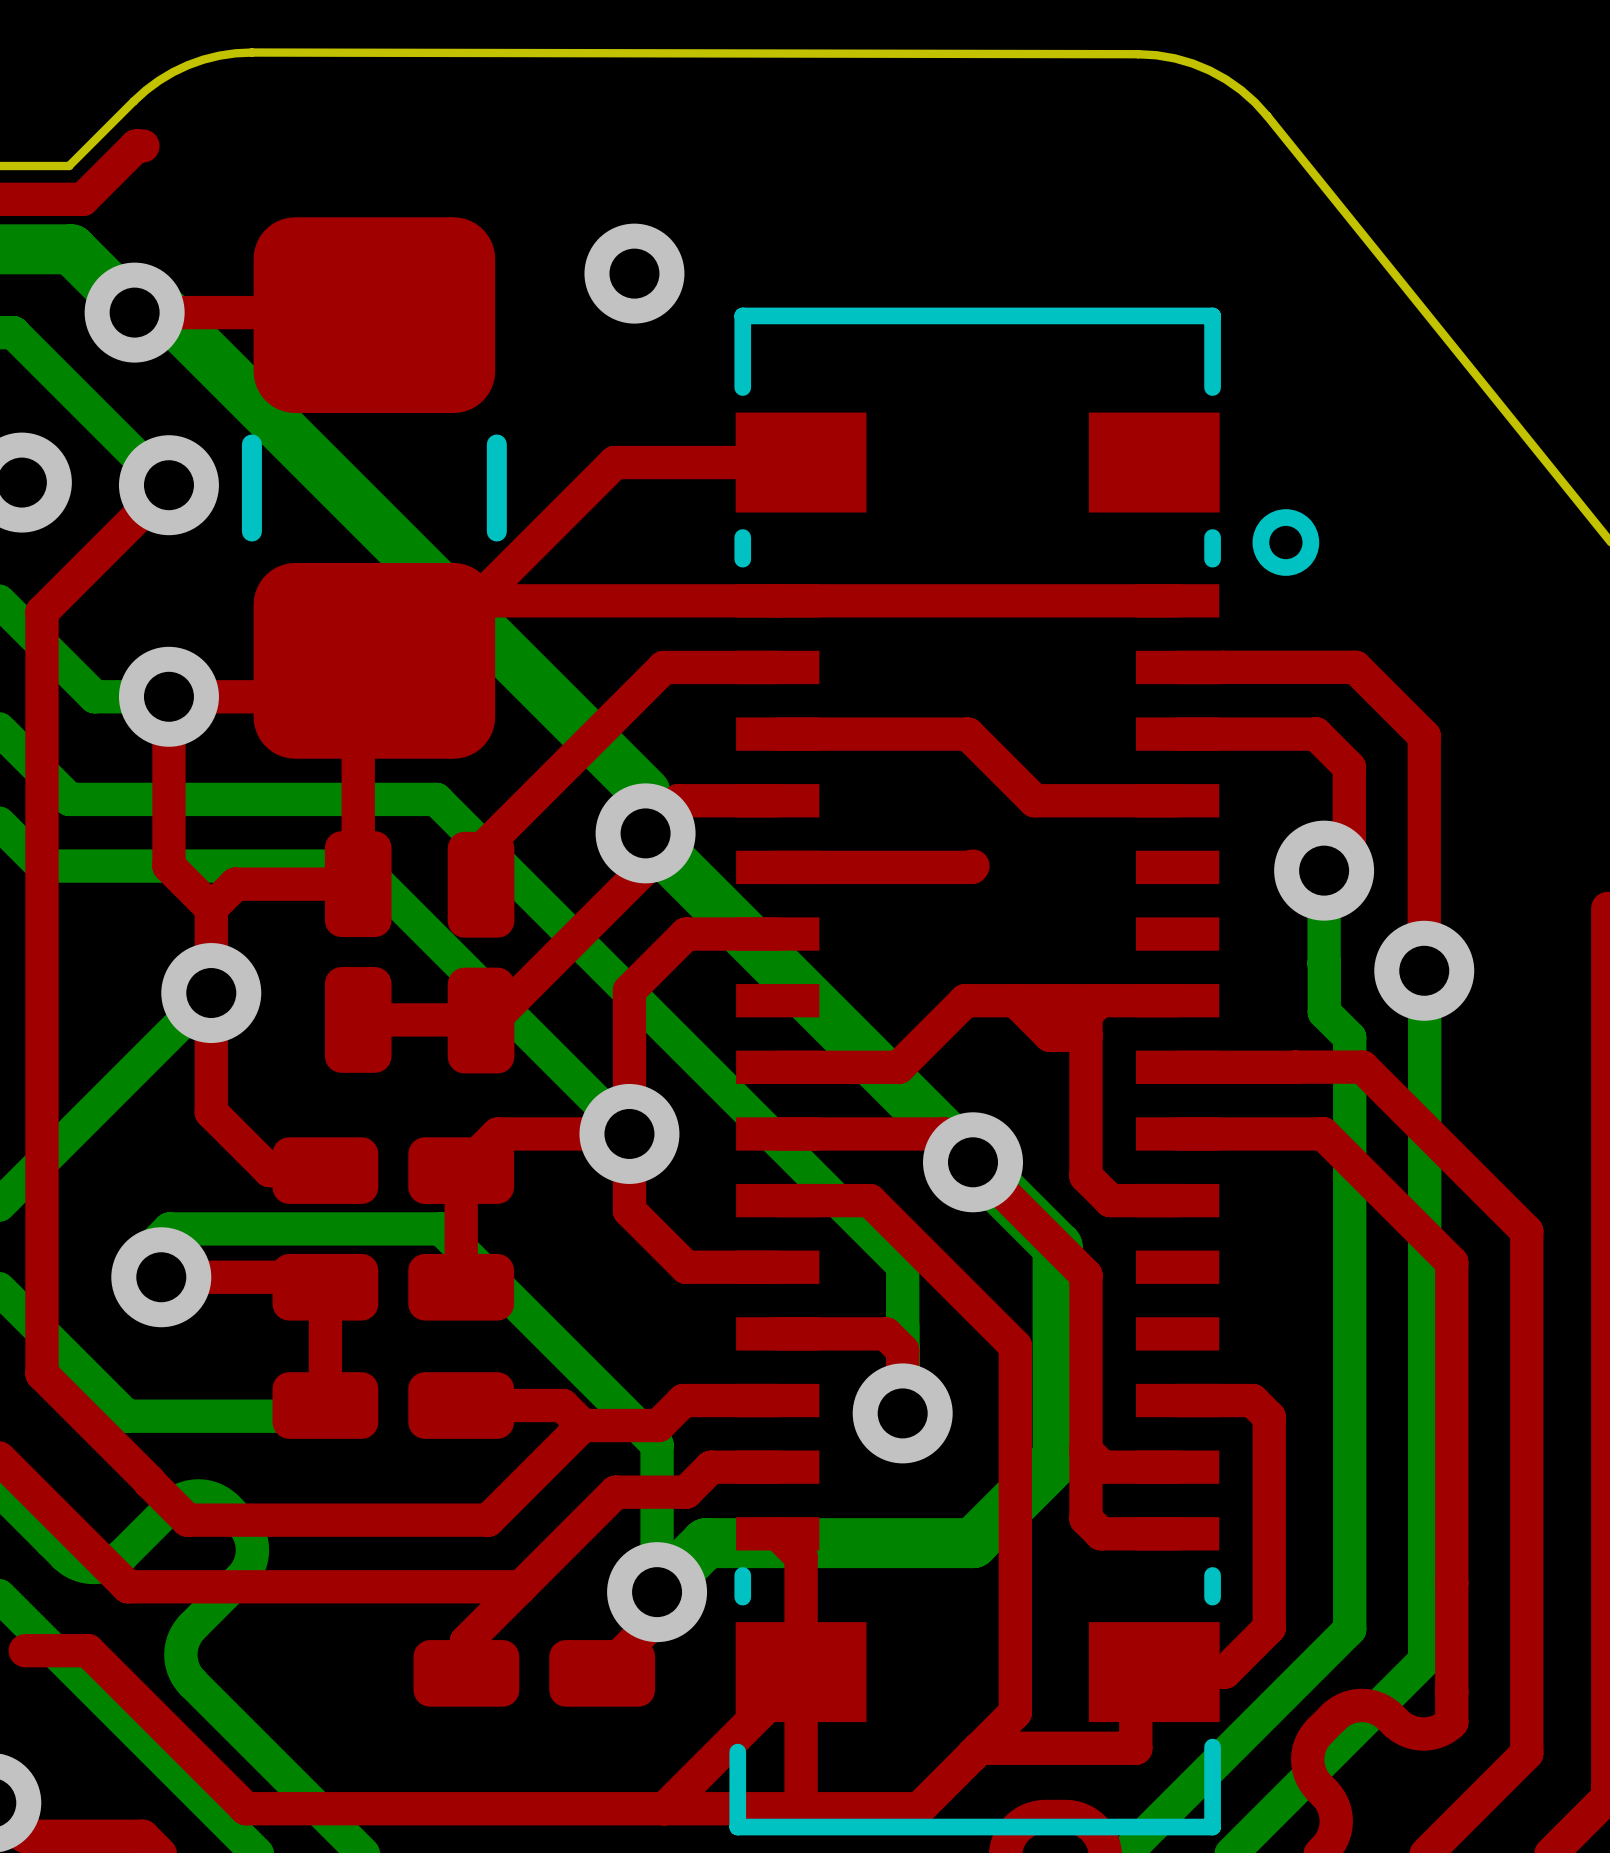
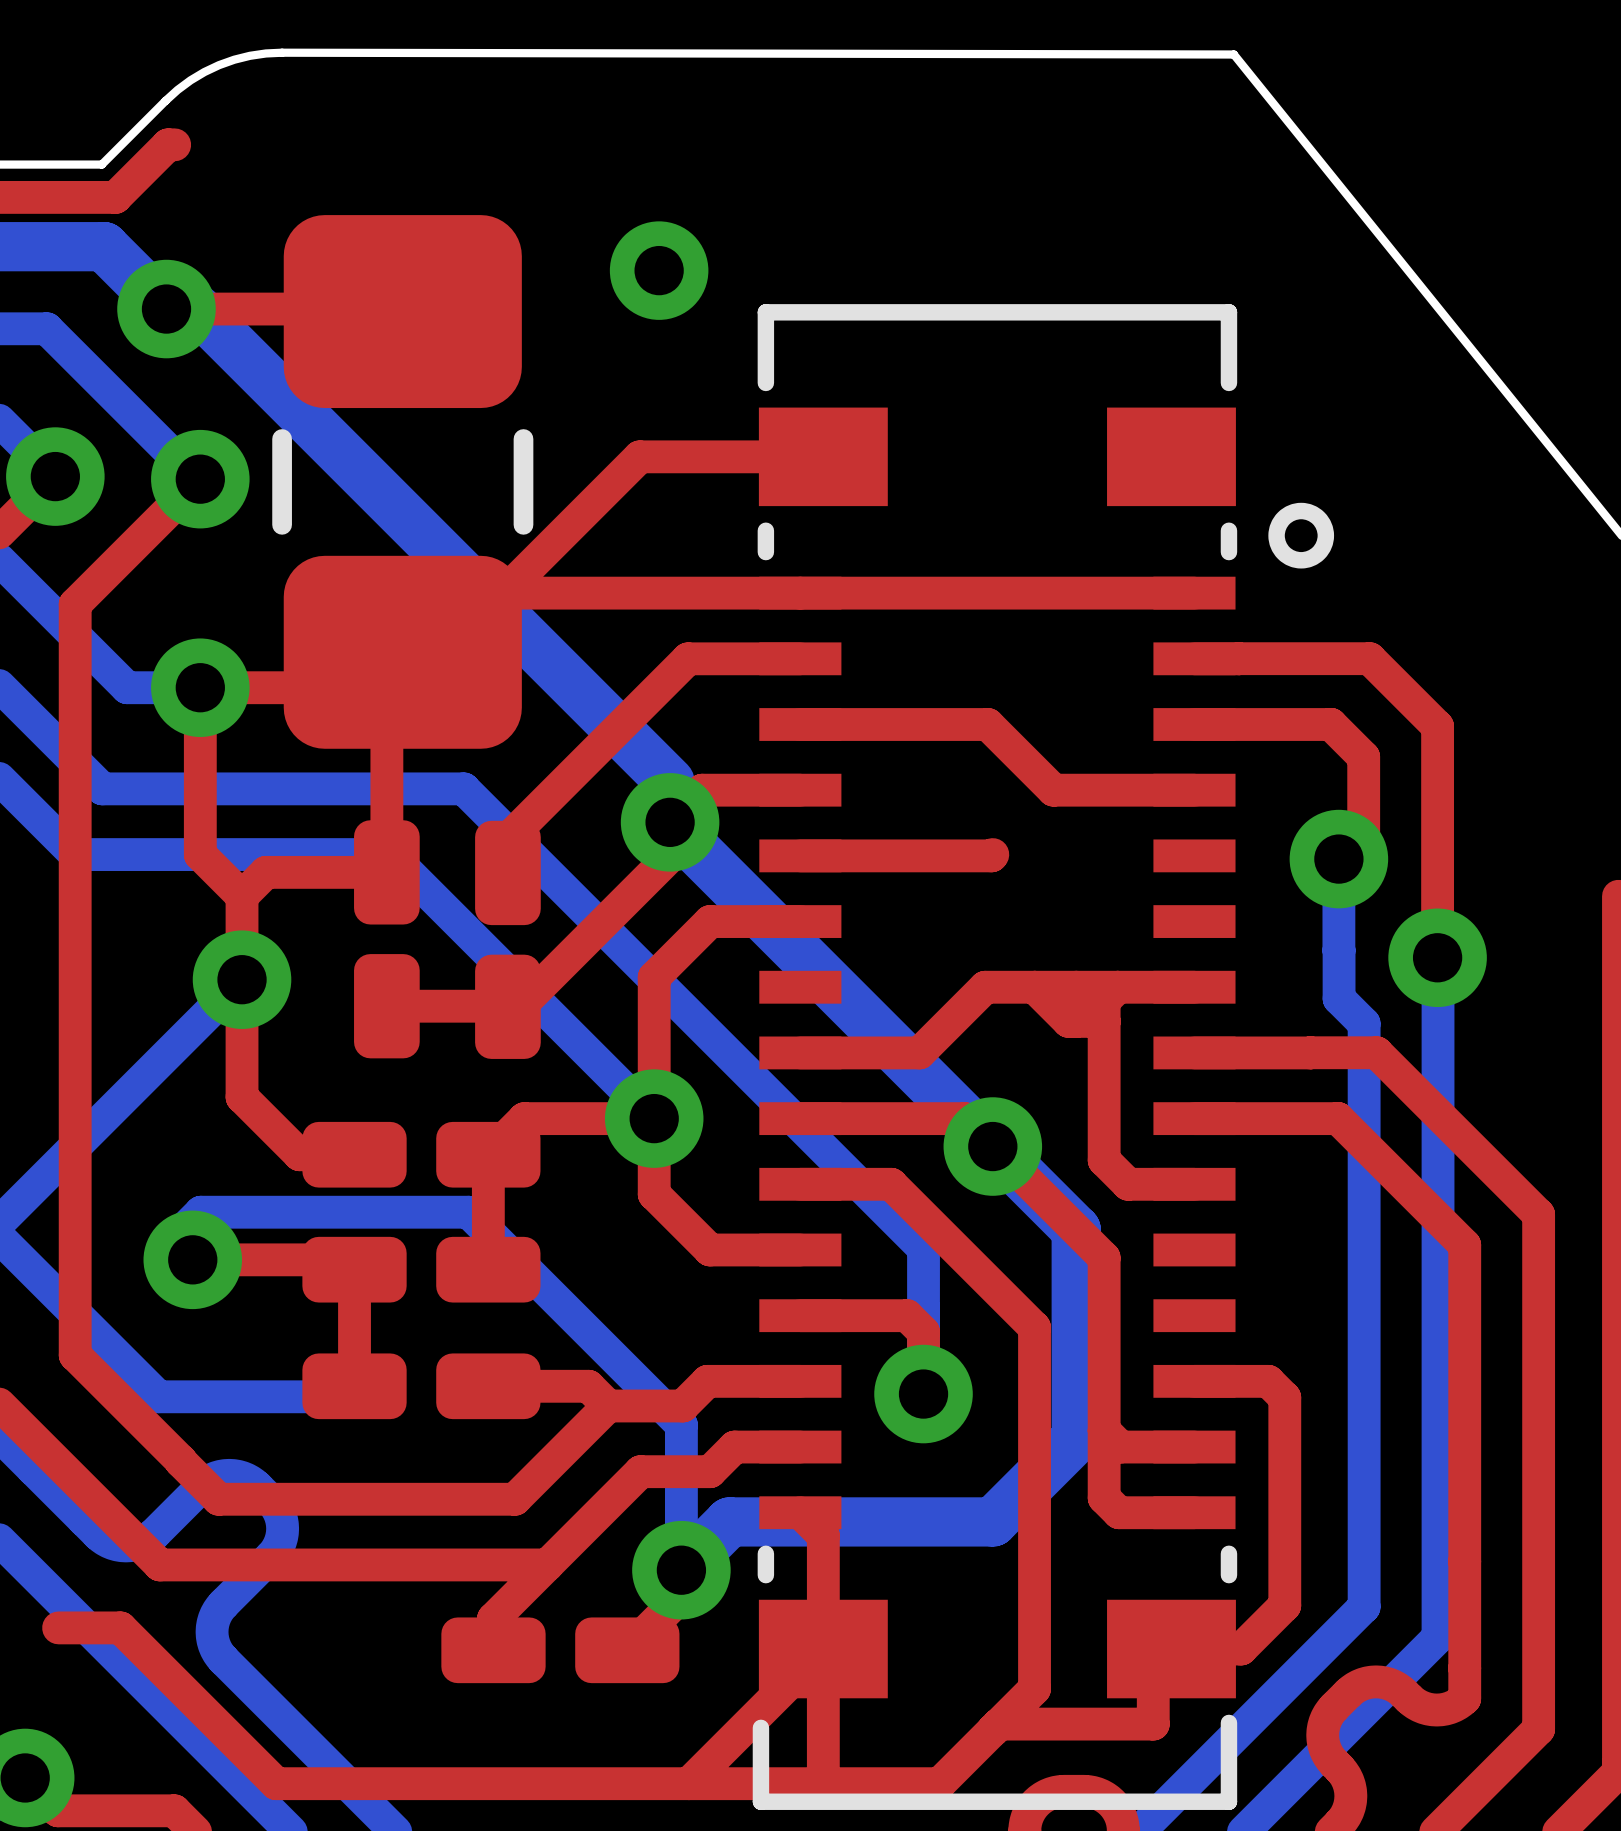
board edge: (1138, 54) (1174, 58) (1209, 70) (1241, 90) (1267, 116) -> (1155, 54) (1233, 54) (1283, 115)

